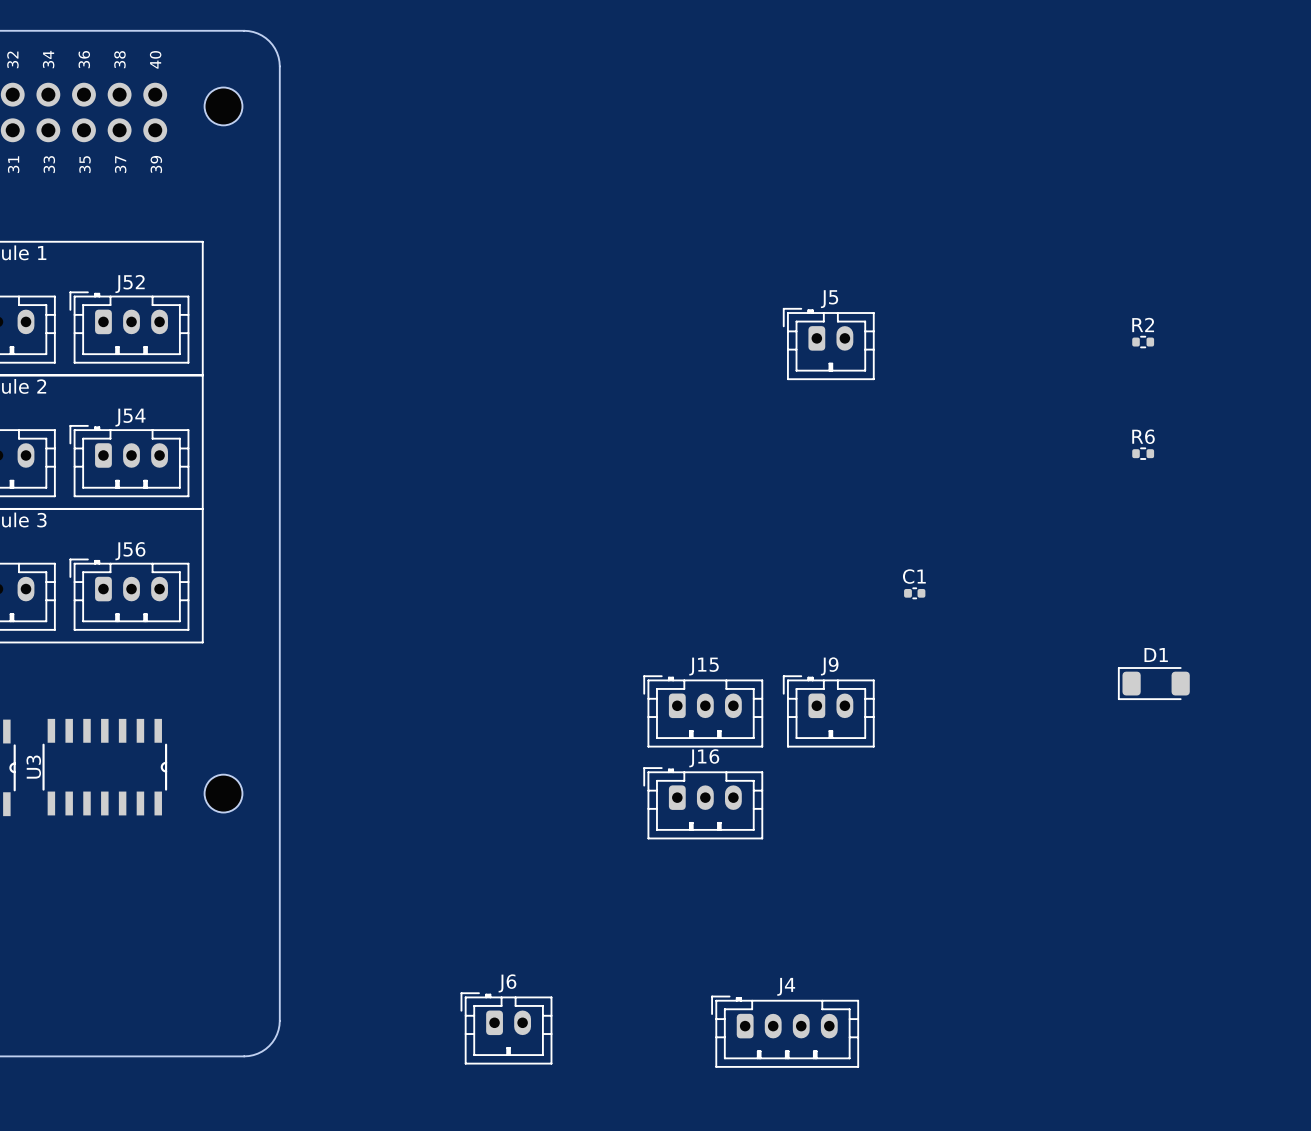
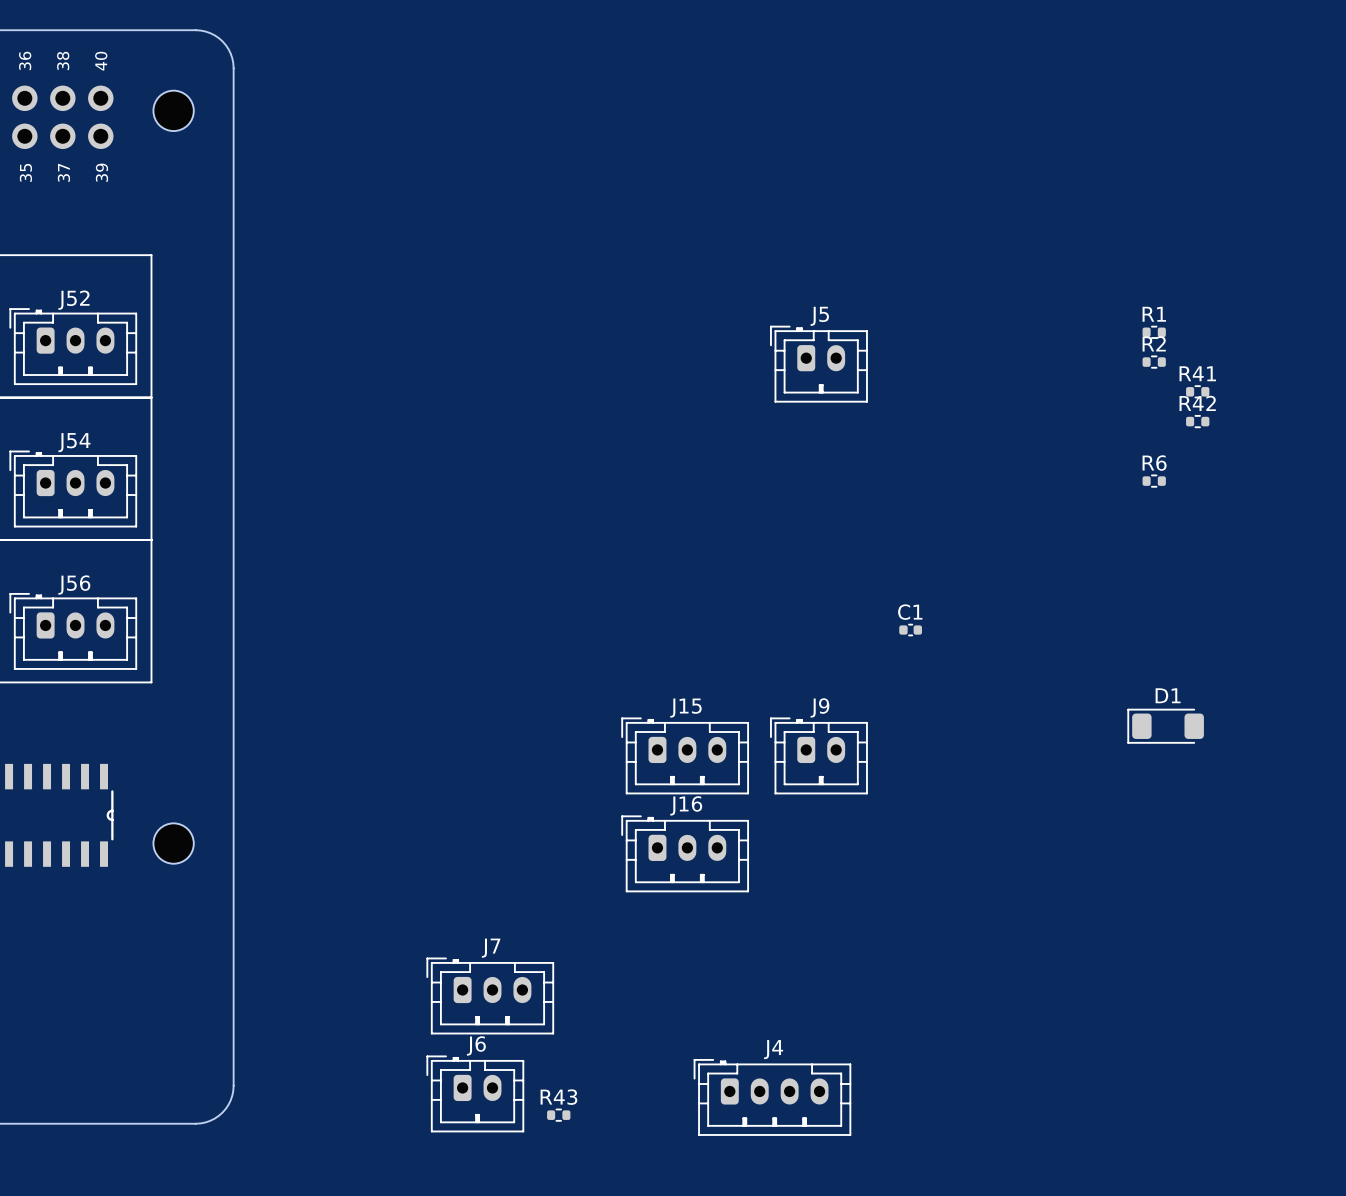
R1: none -> (1154, 332)
R41: none -> (1197, 391)
R42: none -> (1197, 421)
J7: none -> (490, 995)
R43: none -> (558, 1115)

